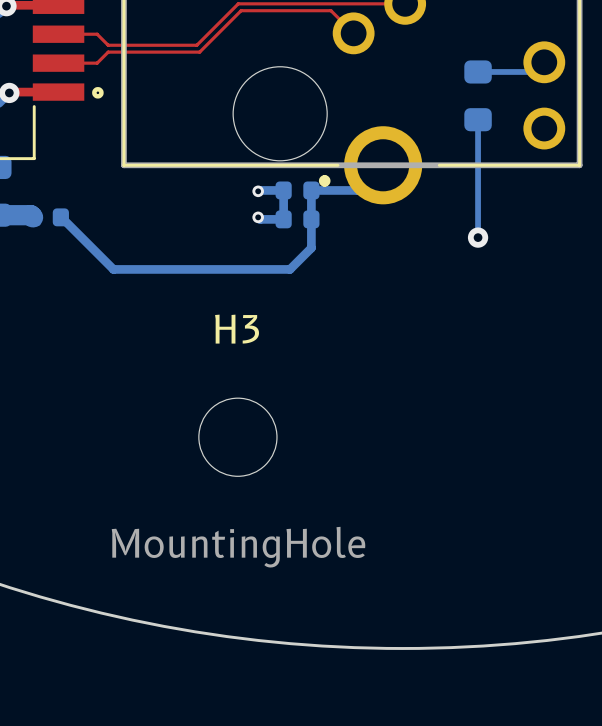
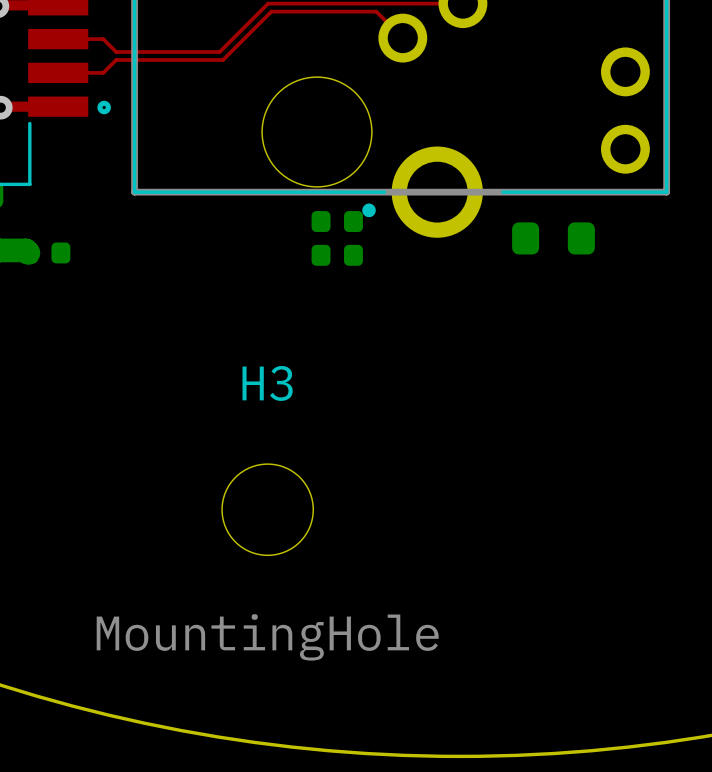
bottom track: (544, 62) (534, 71) (478, 71) -> none
part rotation: 0° (478, 95) -> 90° clockwise (553, 238)
part position: (478, 95) -> (553, 238)
bottom track: (478, 119) (478, 237) -> none
bottom track: (383, 165) (357, 190) (311, 190) (311, 248) (289, 269) (113, 269) (60, 217) -> none
bottom track: (258, 191) (283, 190) (283, 219) (260, 219) (258, 217) -> none
via: (258, 191) -> none
via: (258, 217) -> none
via: (478, 237) -> none

